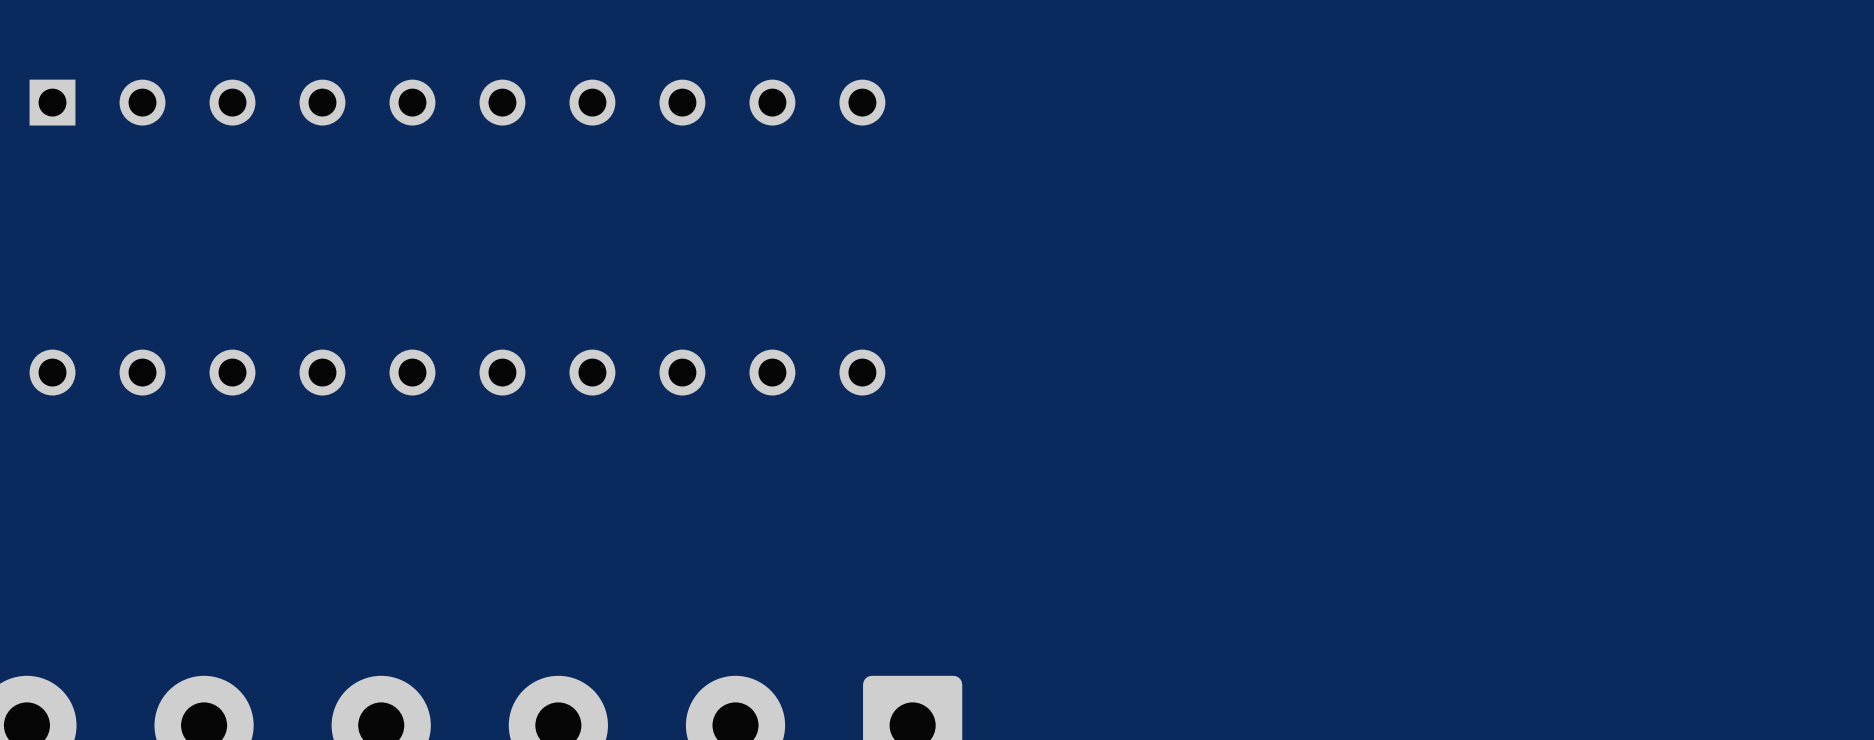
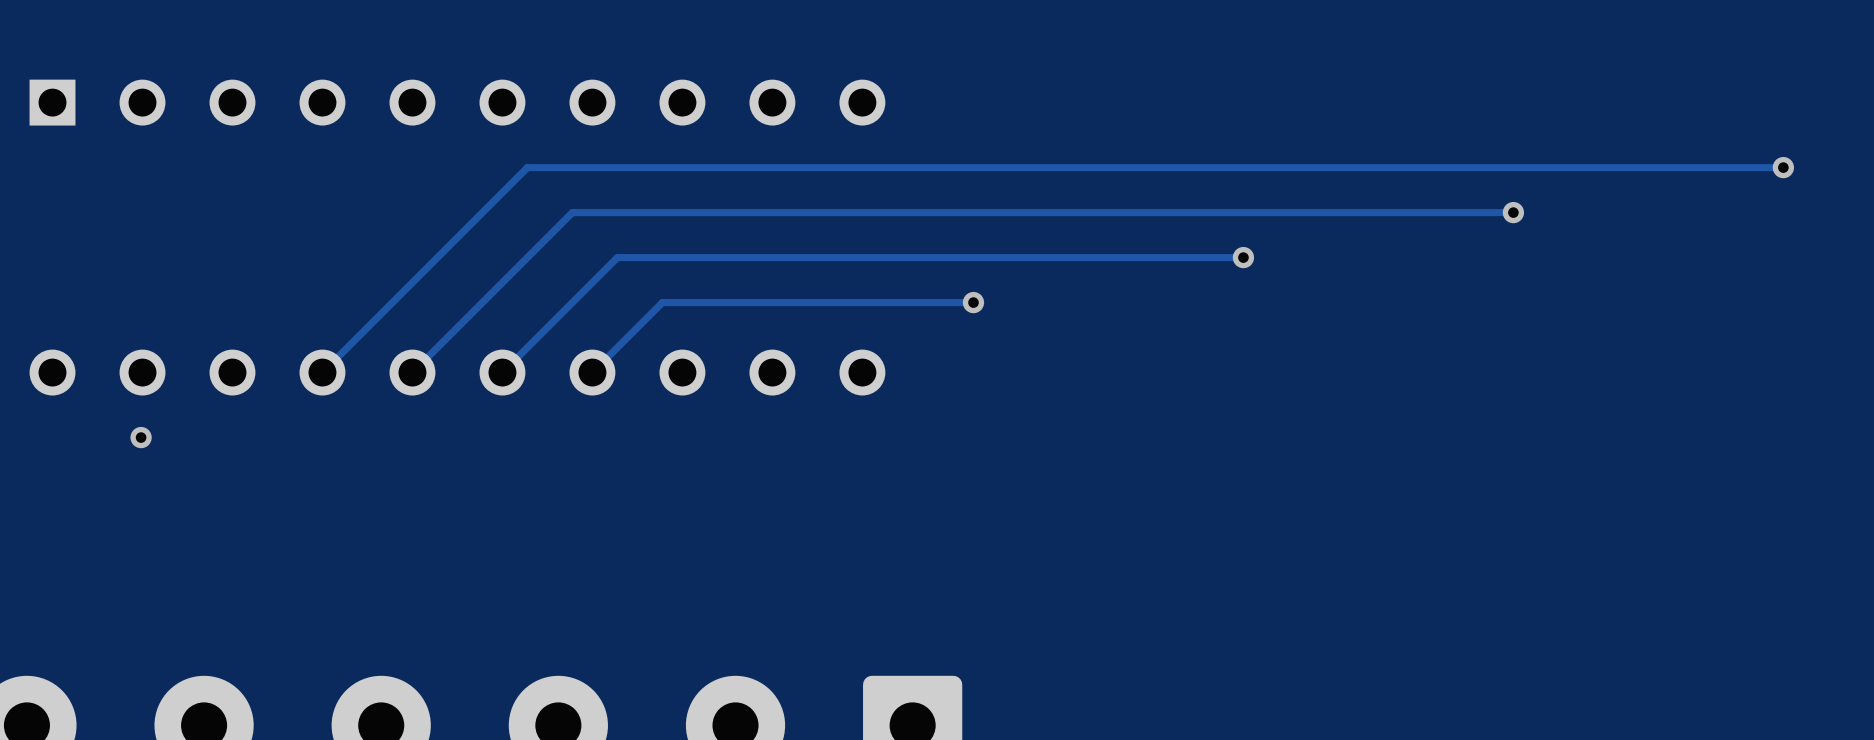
track: none -> (1783, 167) (527, 167) (322, 372)
via: none -> (1783, 167)
track: none -> (1513, 212) (572, 212) (412, 372)
via: none -> (1513, 212)
track: none -> (1243, 257) (617, 257) (502, 372)
via: none -> (1243, 257)
track: none -> (973, 302) (662, 302) (592, 372)
via: none -> (973, 302)
via: none -> (141, 437)

